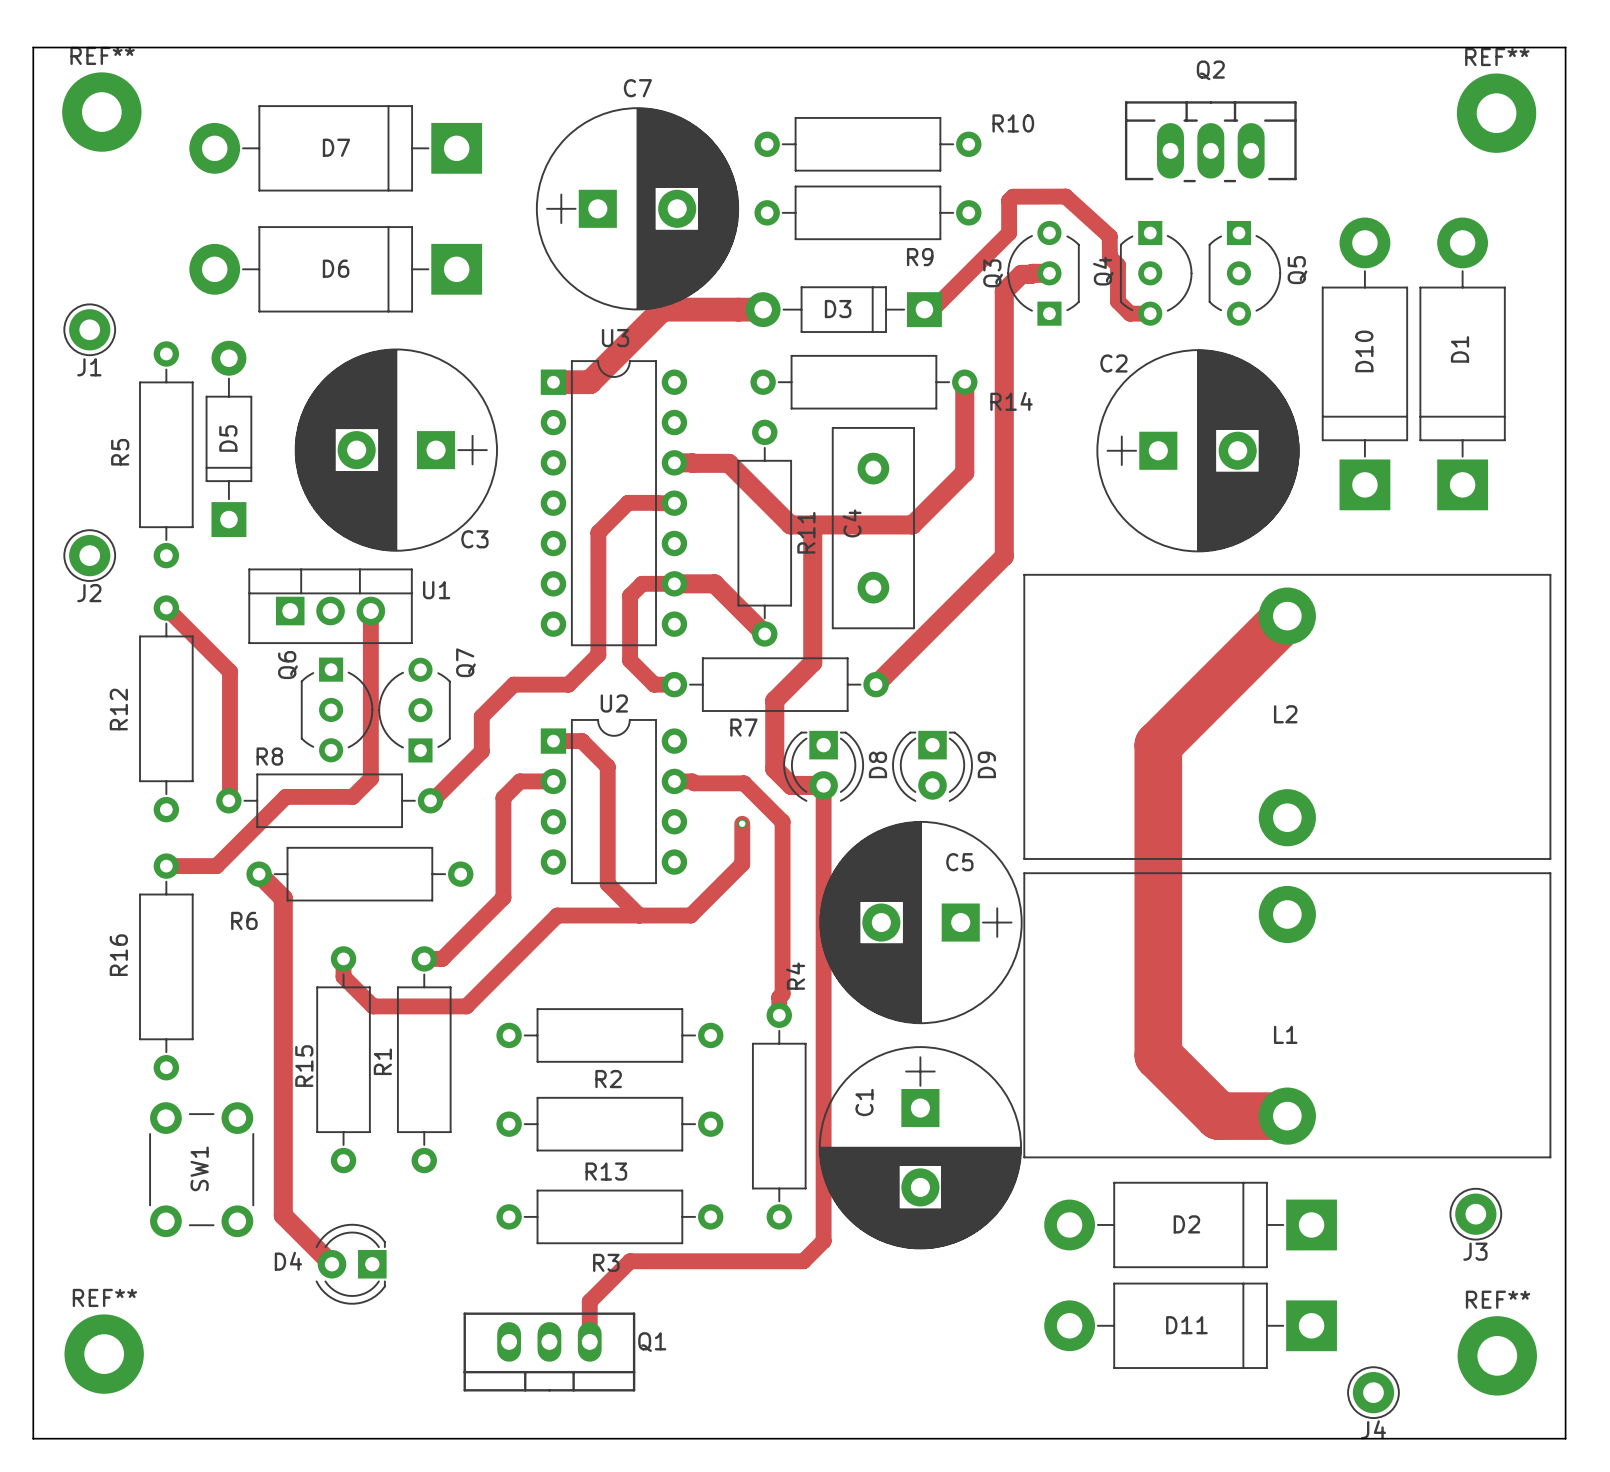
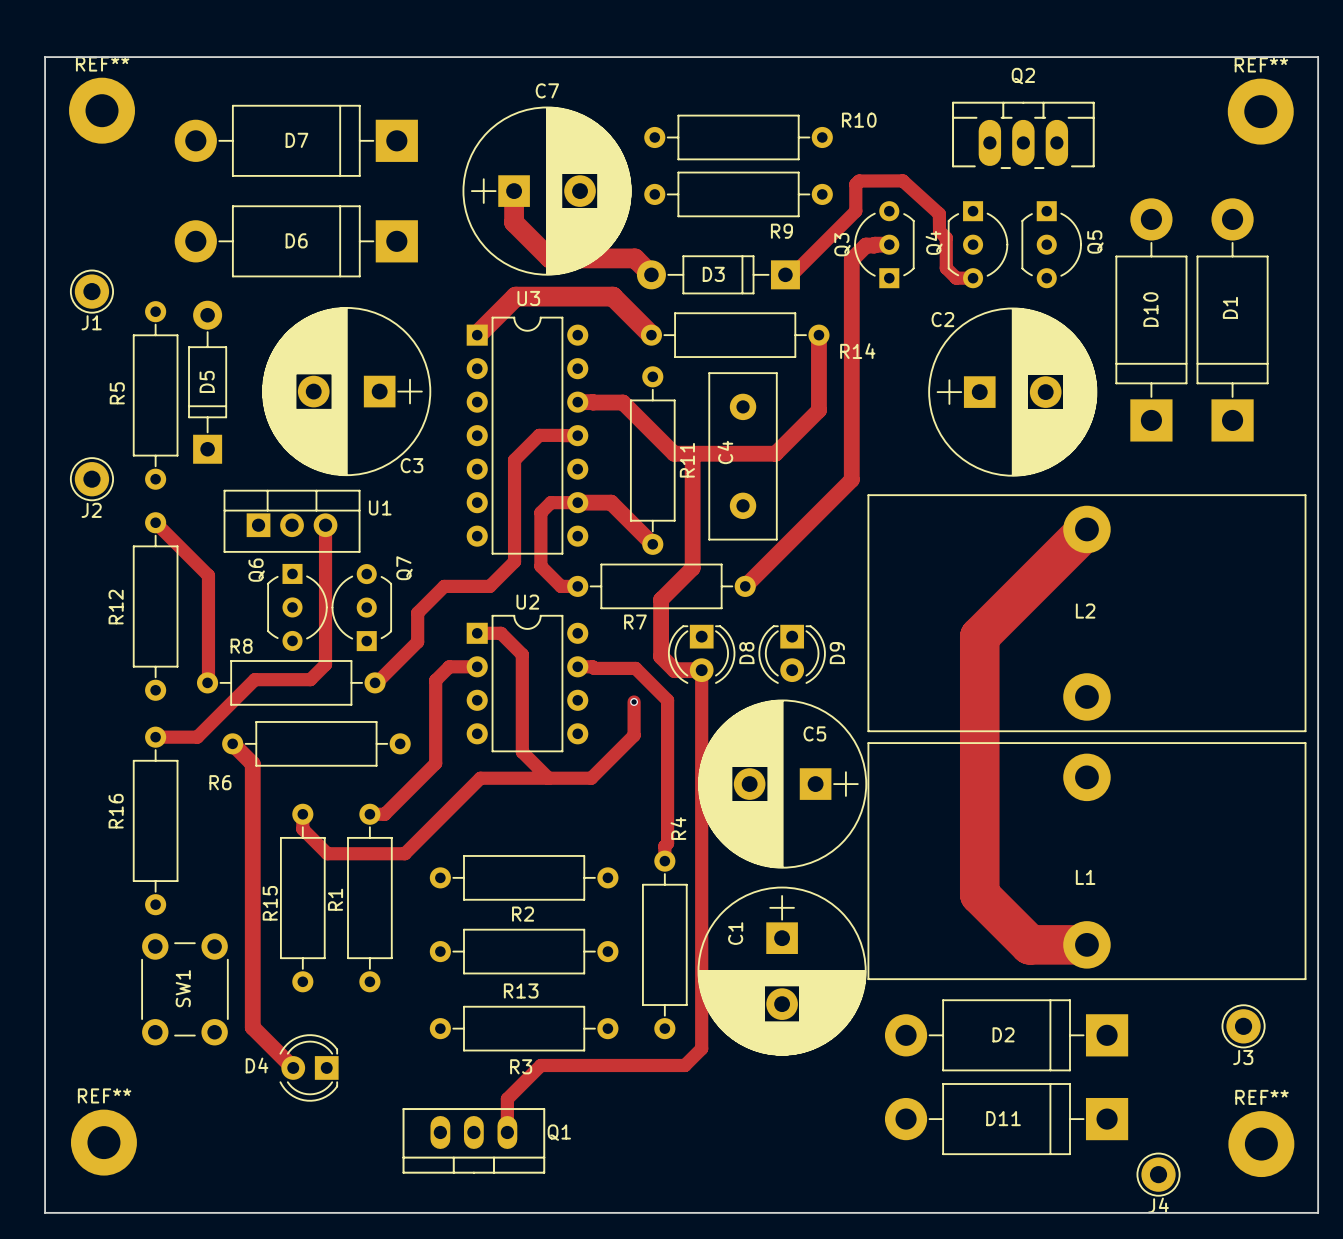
track: none -> (514, 191) (514, 222) (549, 258) (635, 258) (651, 274)
track: (763, 309) (662, 309) (589, 382) (553, 382) -> (651, 335) (612, 296) (515, 296) (477, 335)

